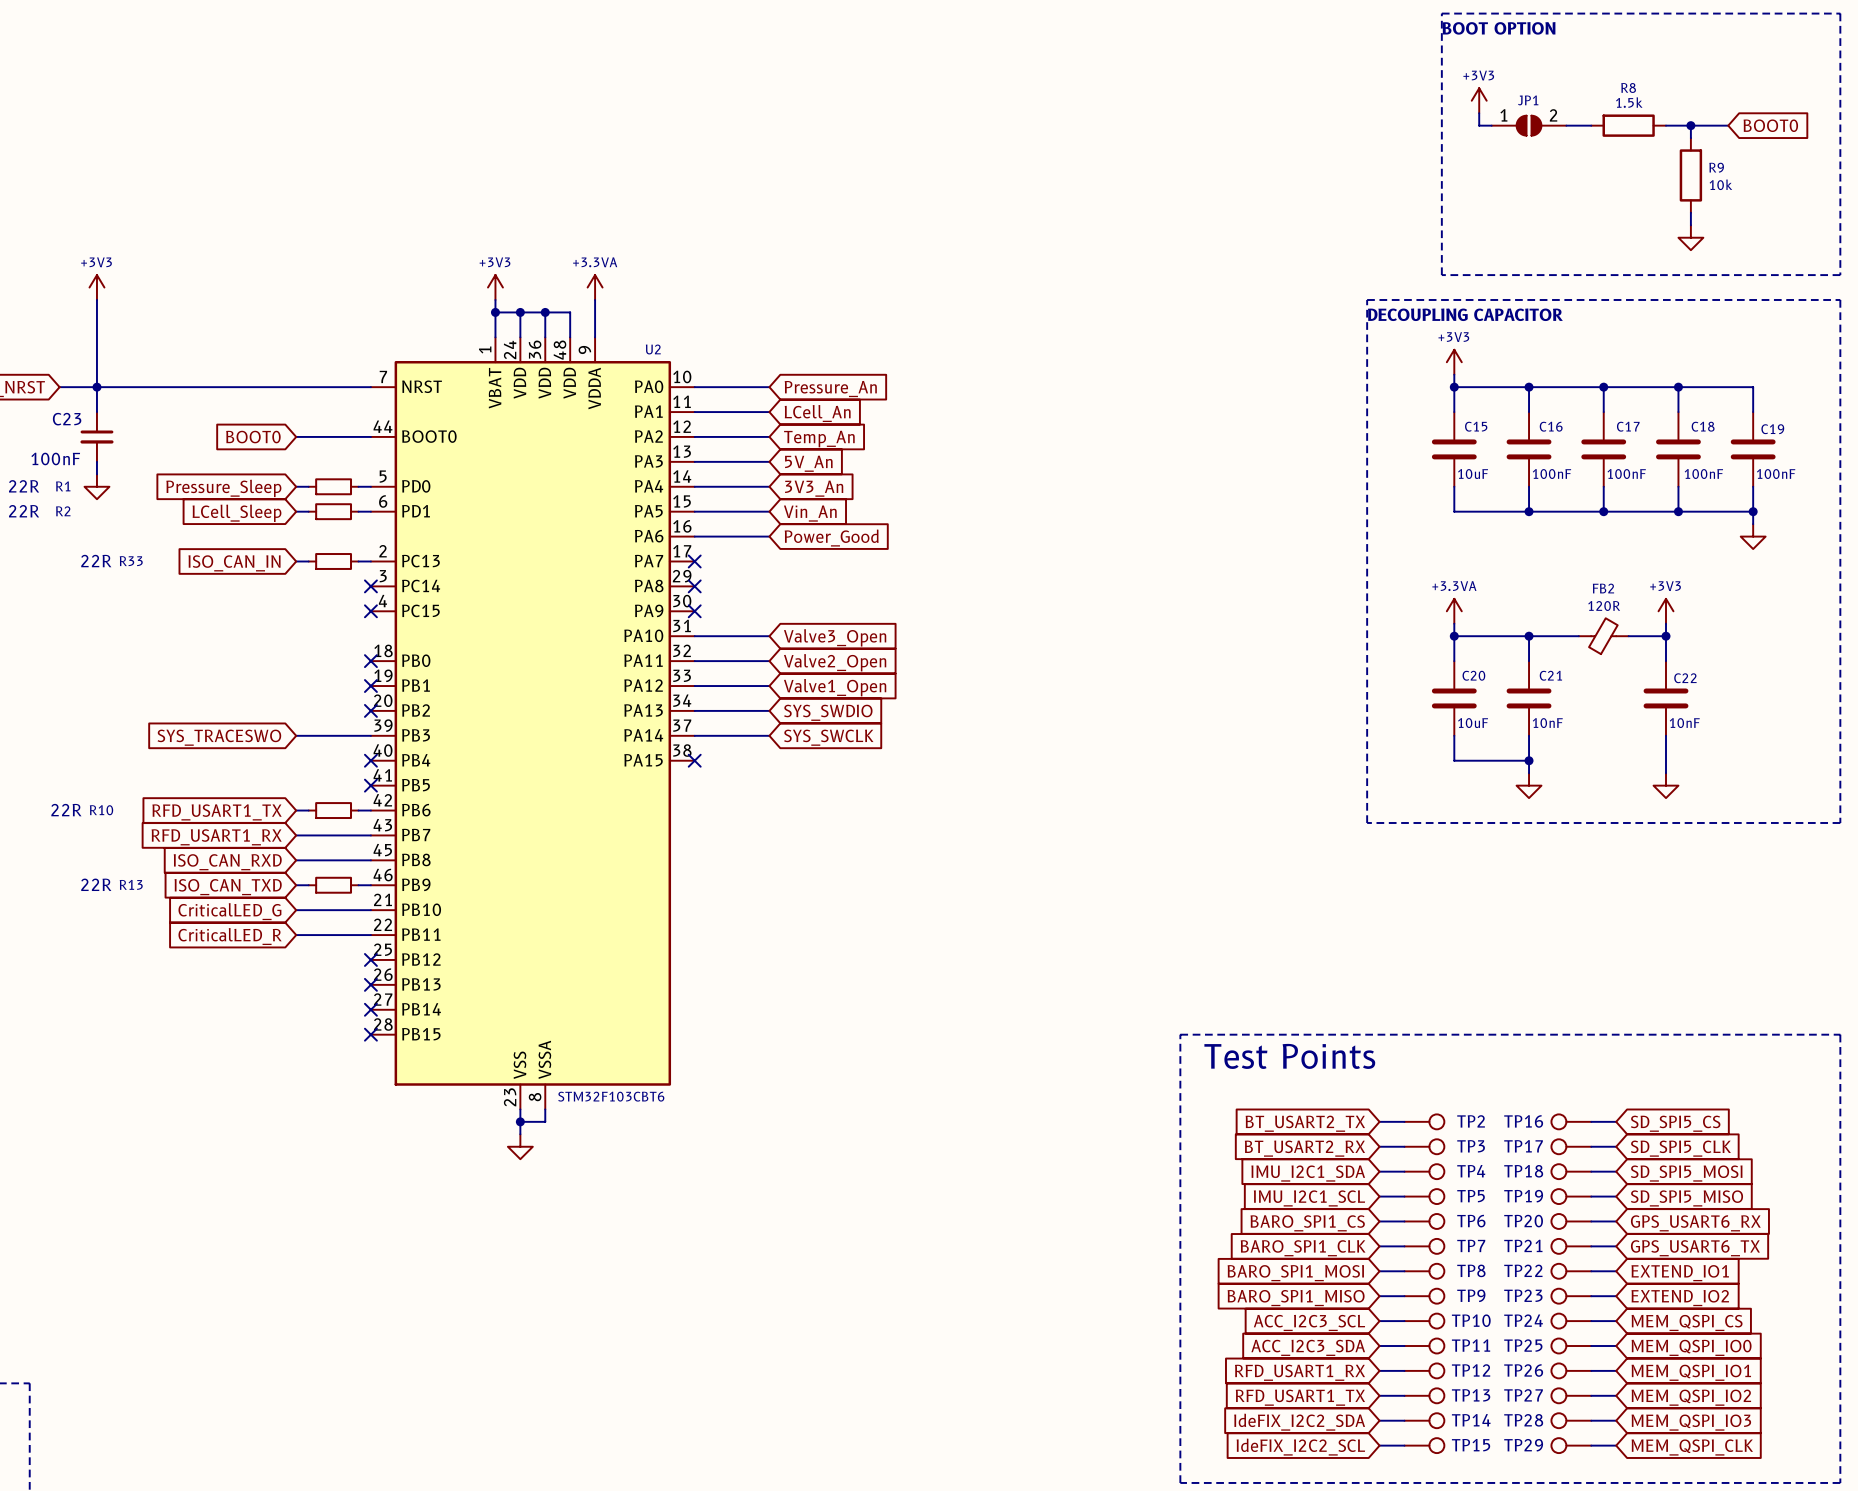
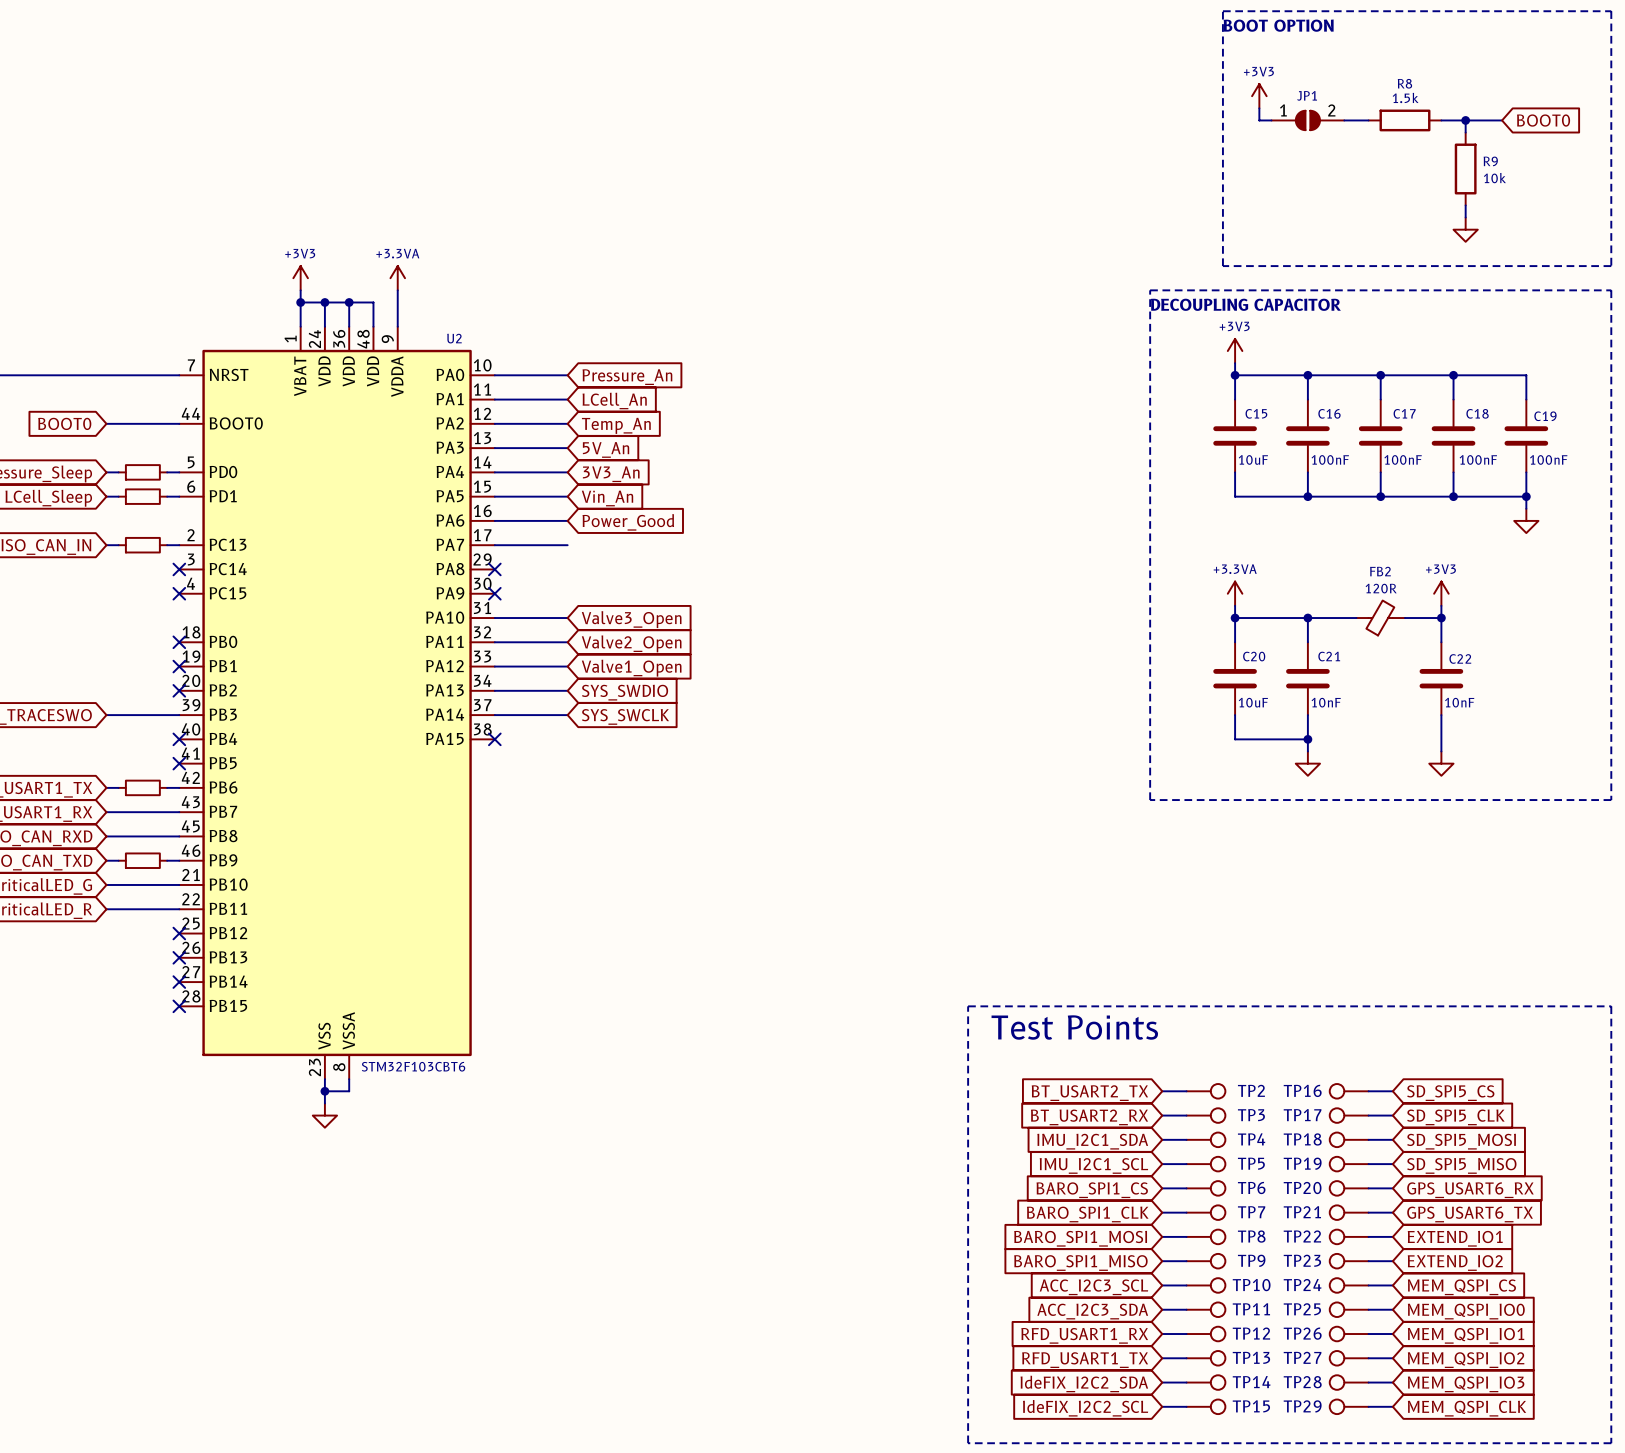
wire: none -> (494, 545) (567, 545)
no-connect mark: (694, 561) -> none

